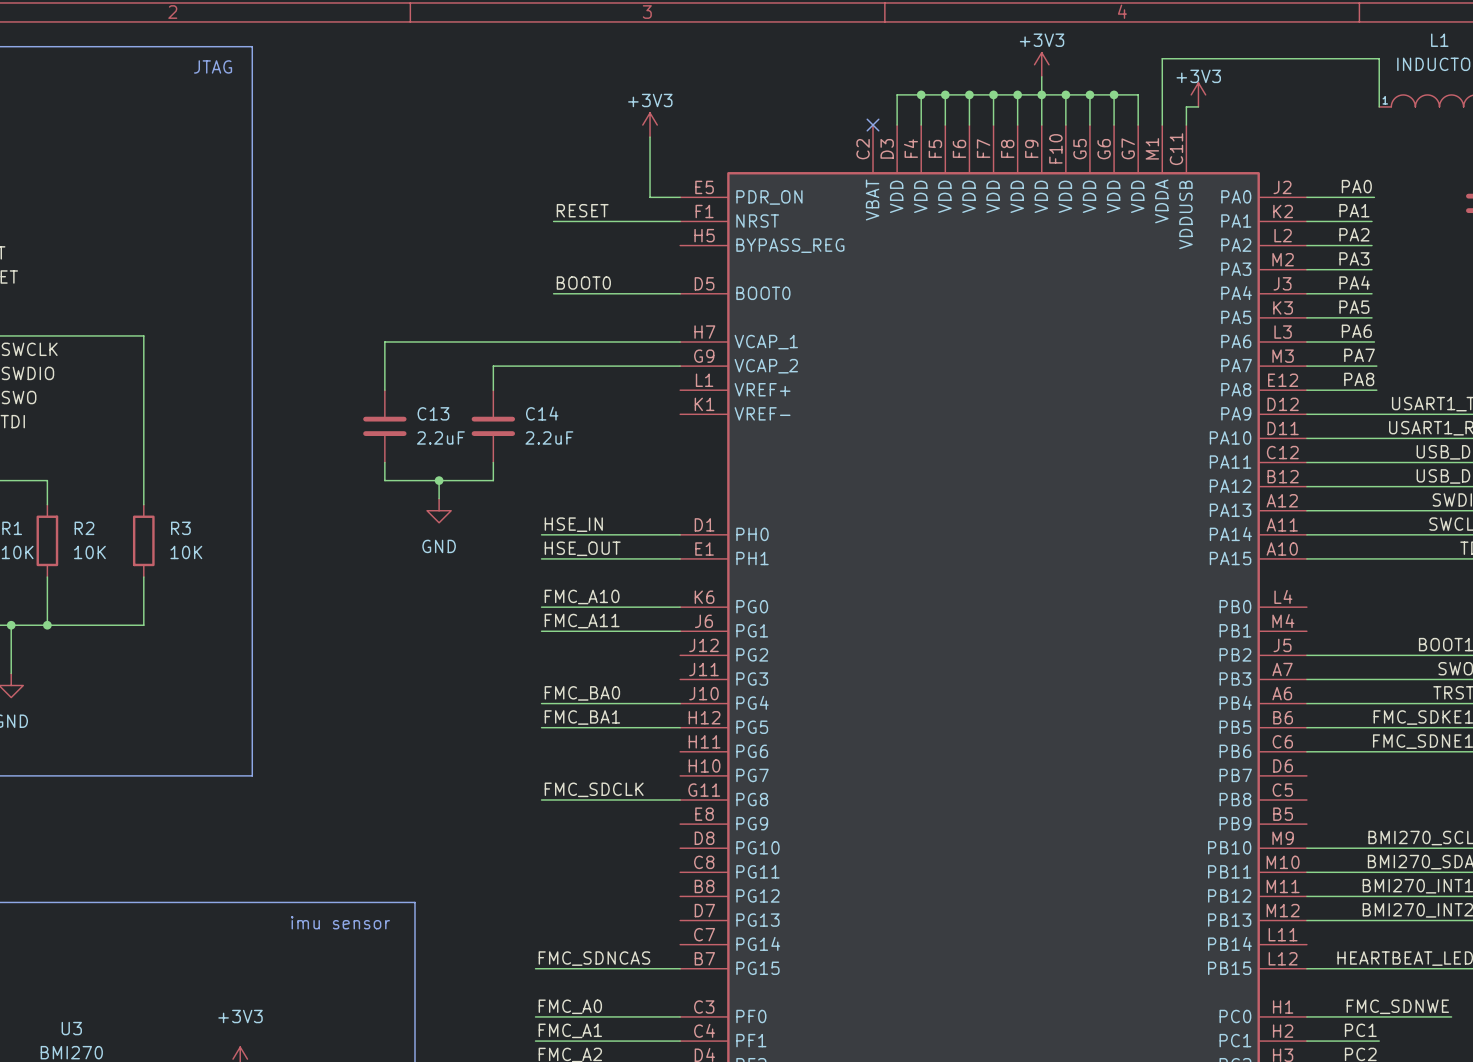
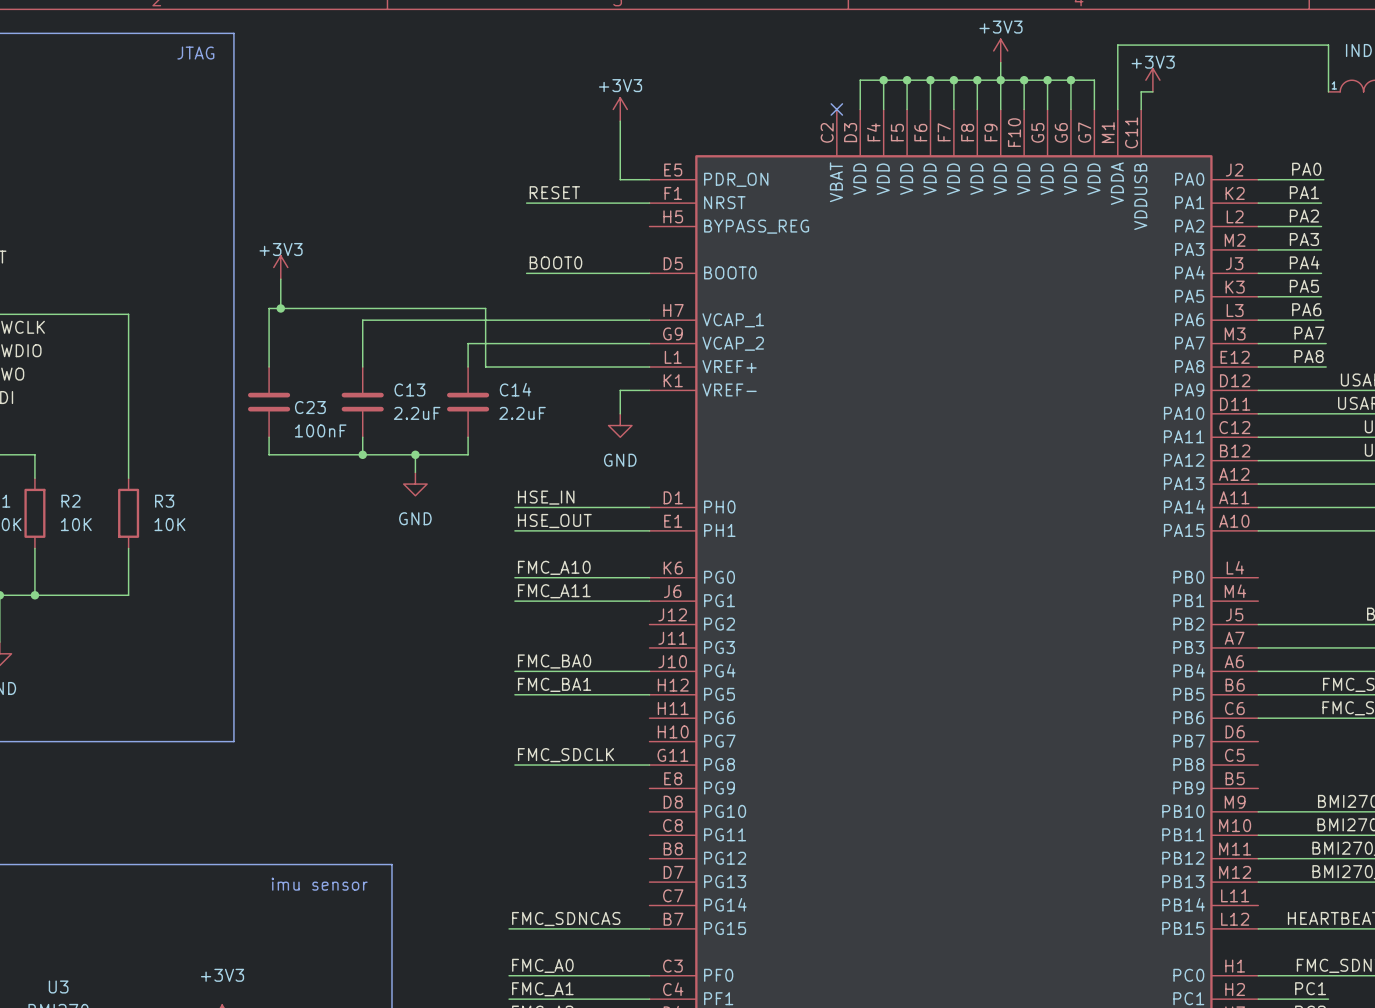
power symbol: none -> +3V3 (280, 267)
wire: none -> (280, 279) (280, 308)
junction: none -> (280, 308)
wire: none -> (269, 367) (269, 308) (485, 308) (485, 367) (649, 367)
wire: none -> (649, 390) (620, 390) (620, 413)
C23: none -> 100nF (269, 402)
power symbol: none -> GND (620, 425)
wire: none -> (269, 437) (269, 454) (362, 454)
junction: none -> (362, 454)

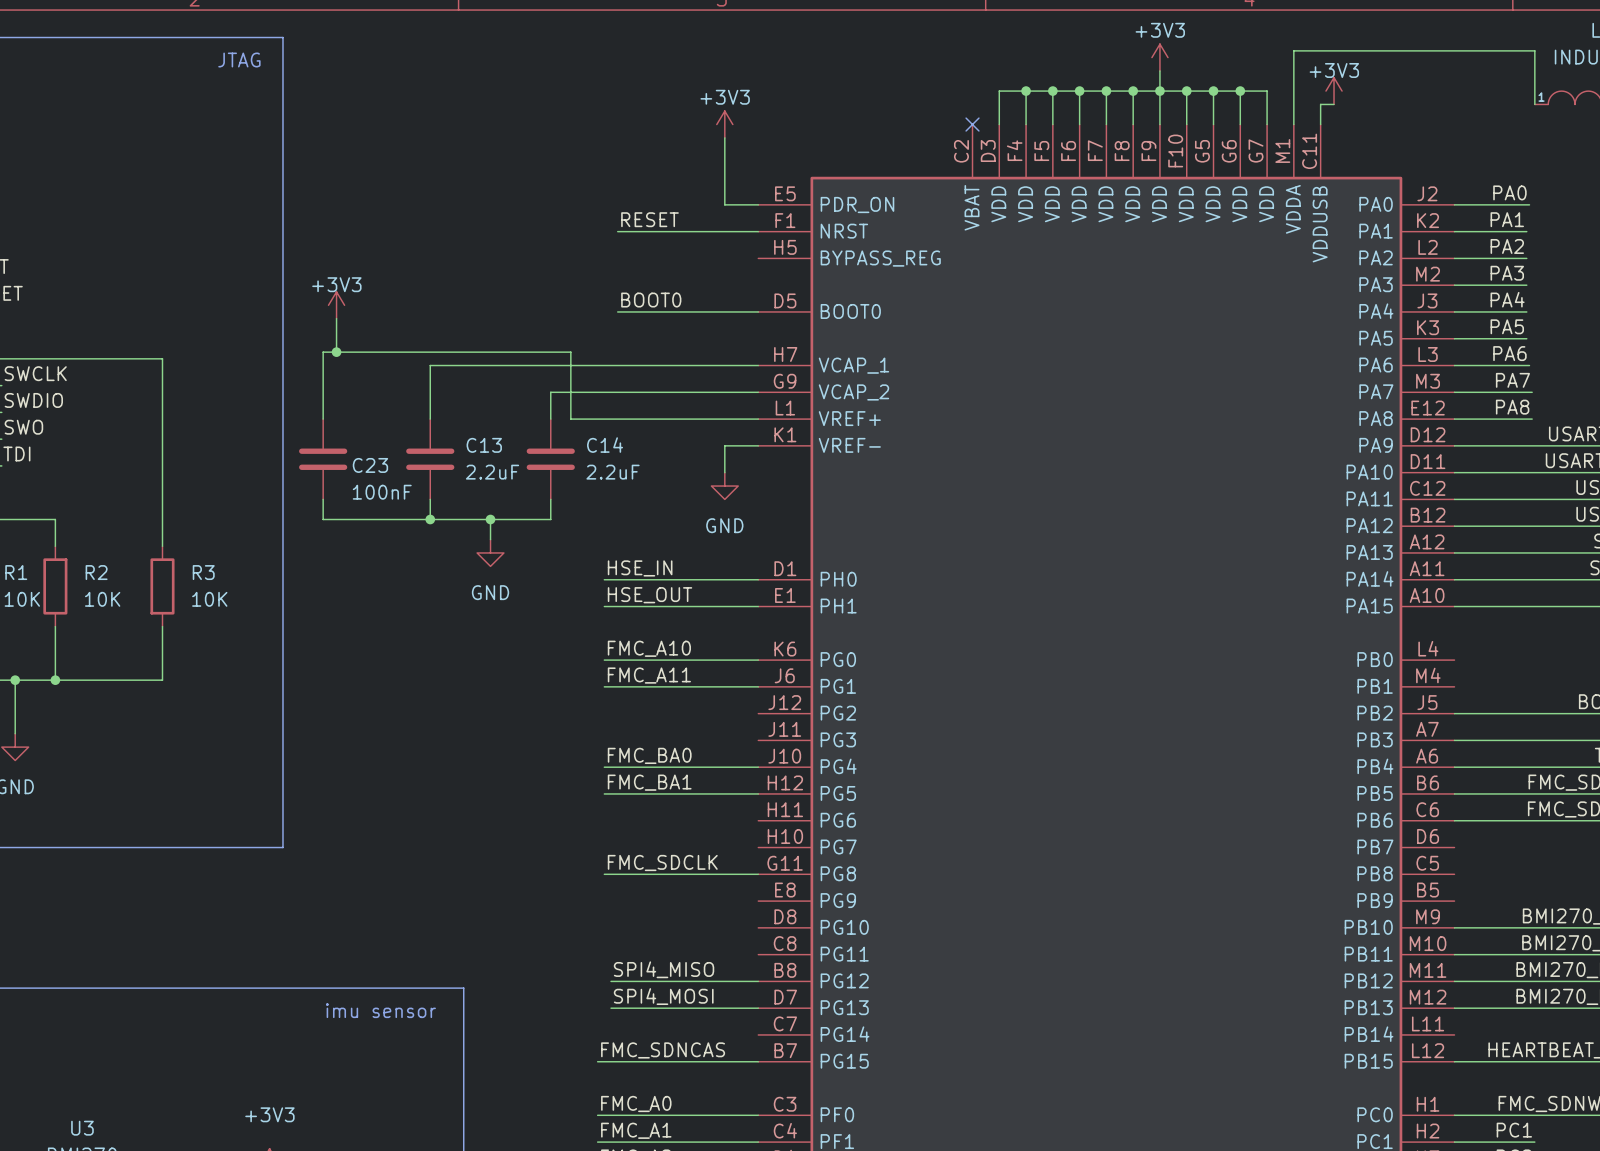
label: none -> SPI4_MISO (664, 969)
wire: none -> (611, 981) (758, 981)
label: none -> SPI4_MOSI (663, 996)
wire: none -> (611, 1008) (758, 1008)

